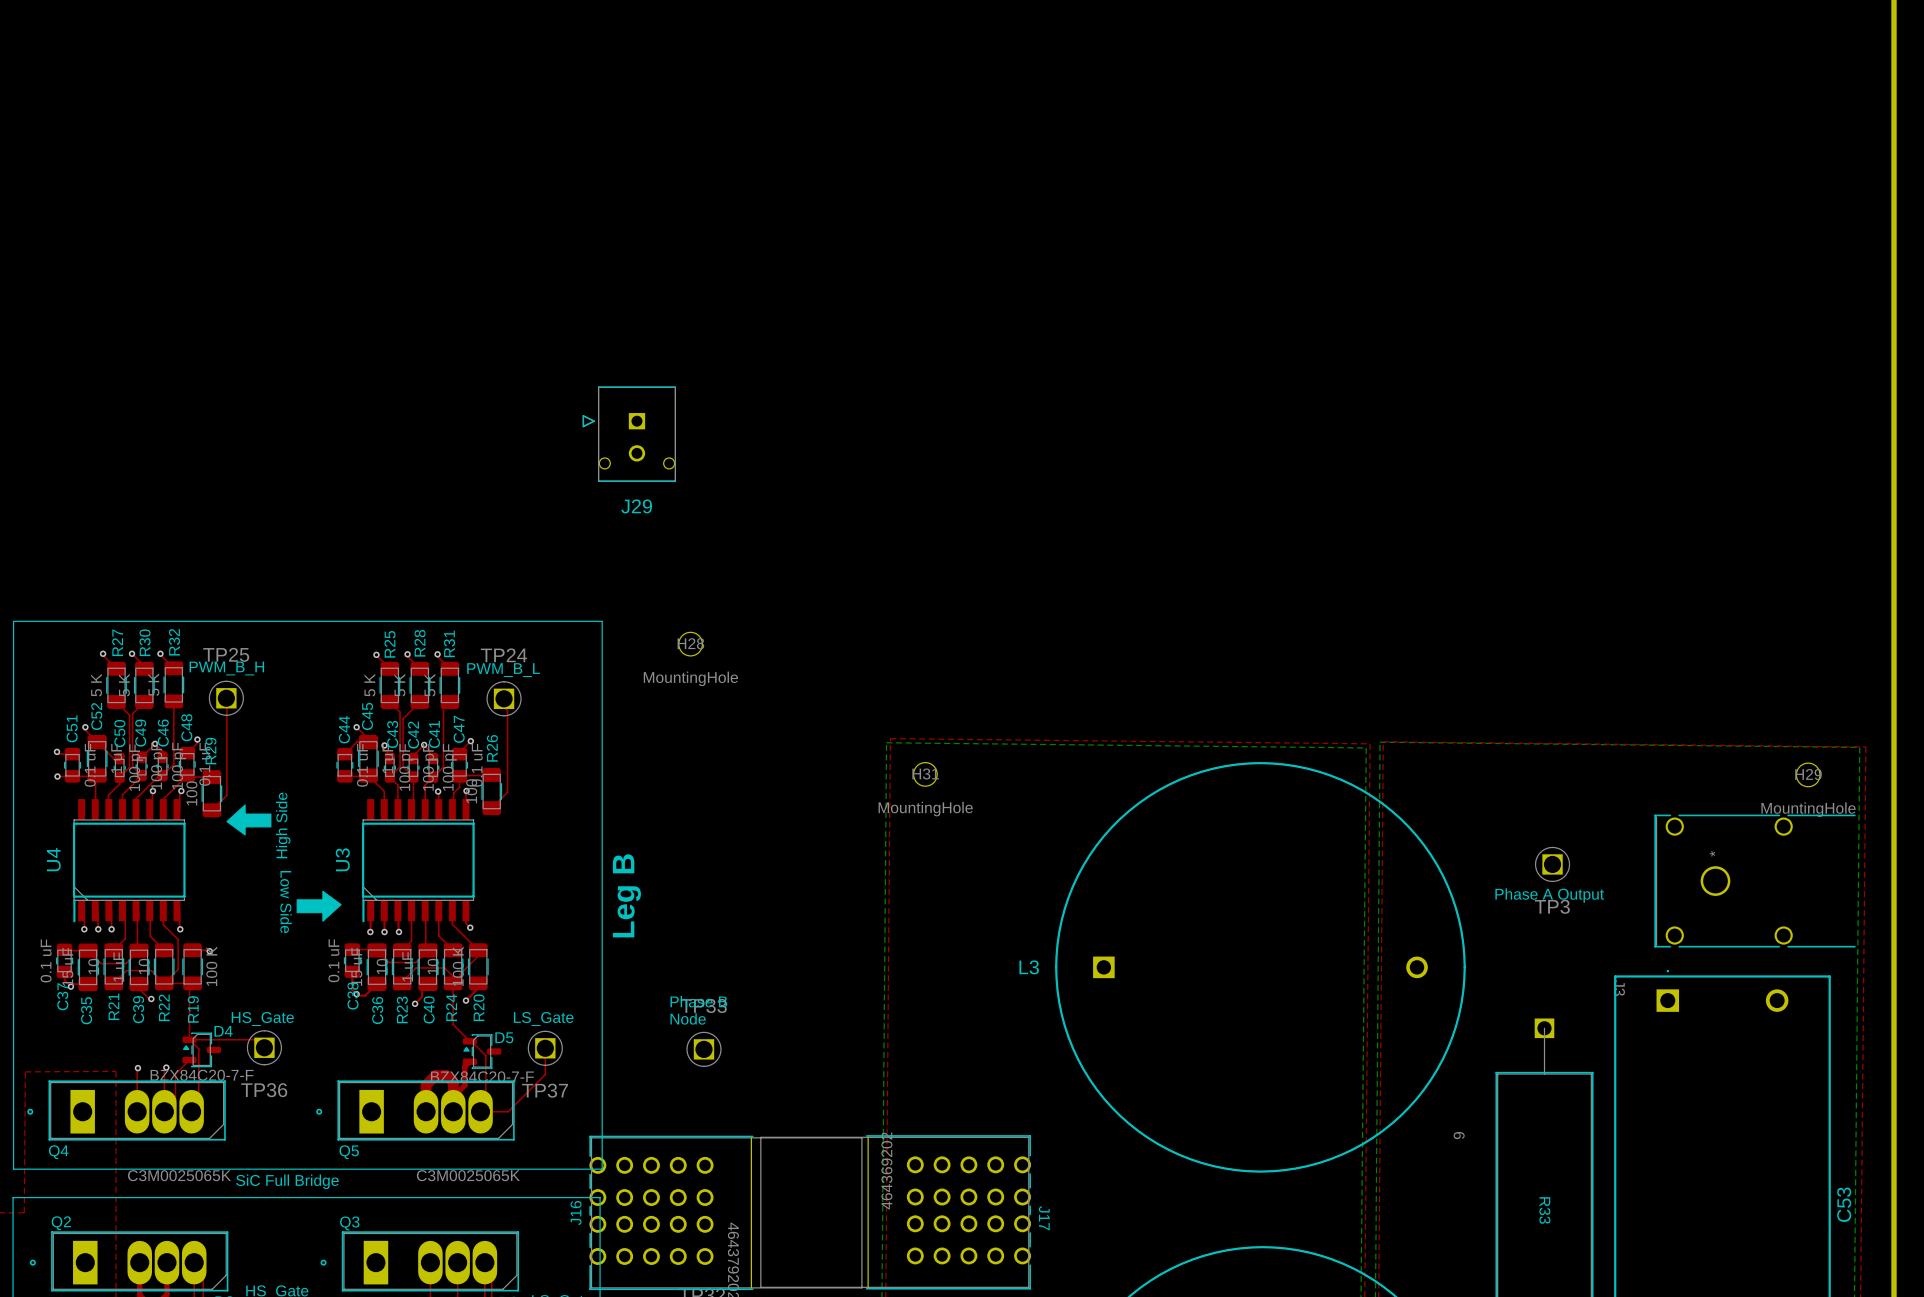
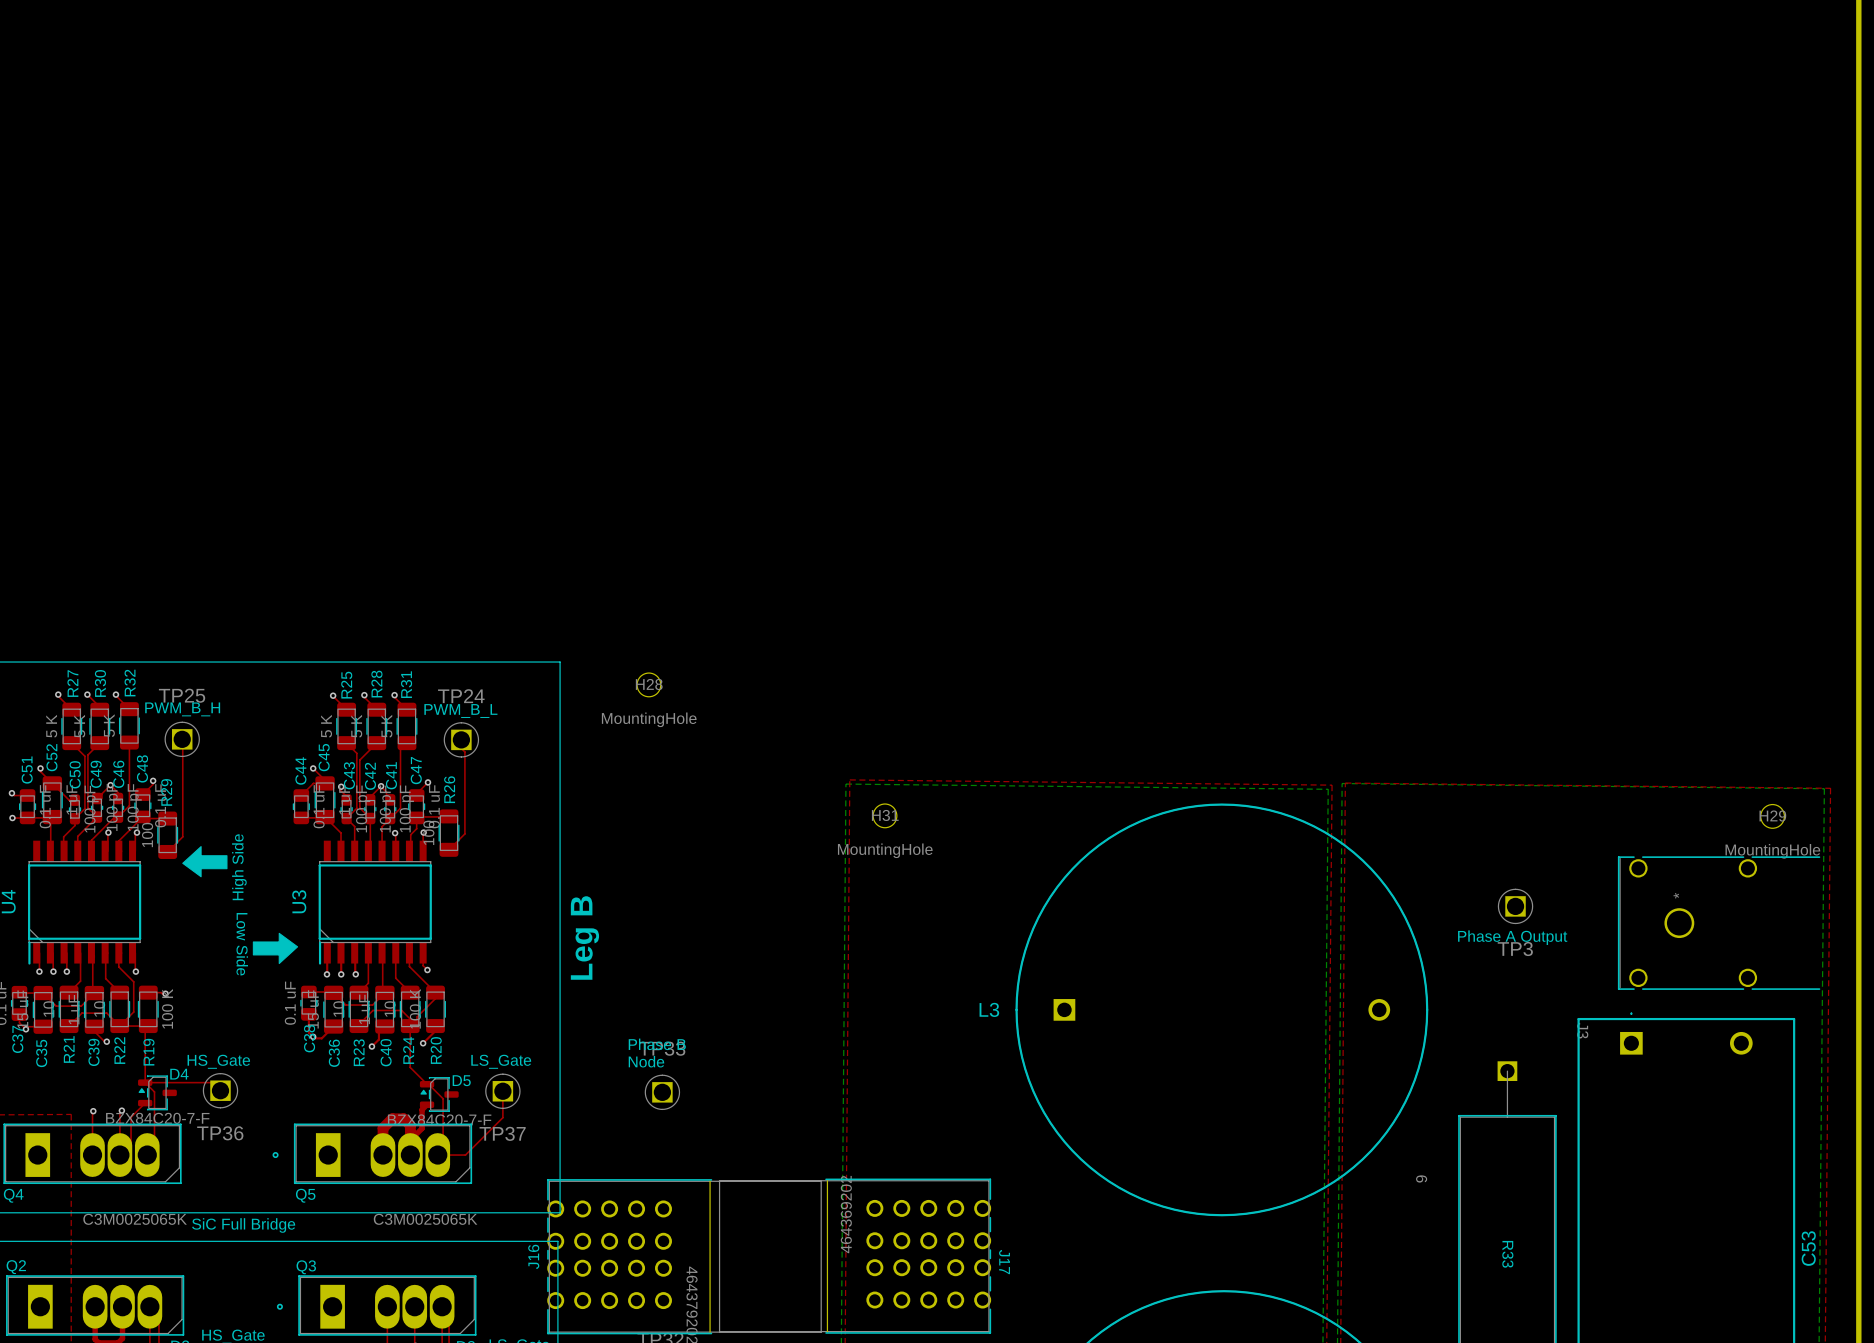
J29: (629, 434) -> none

